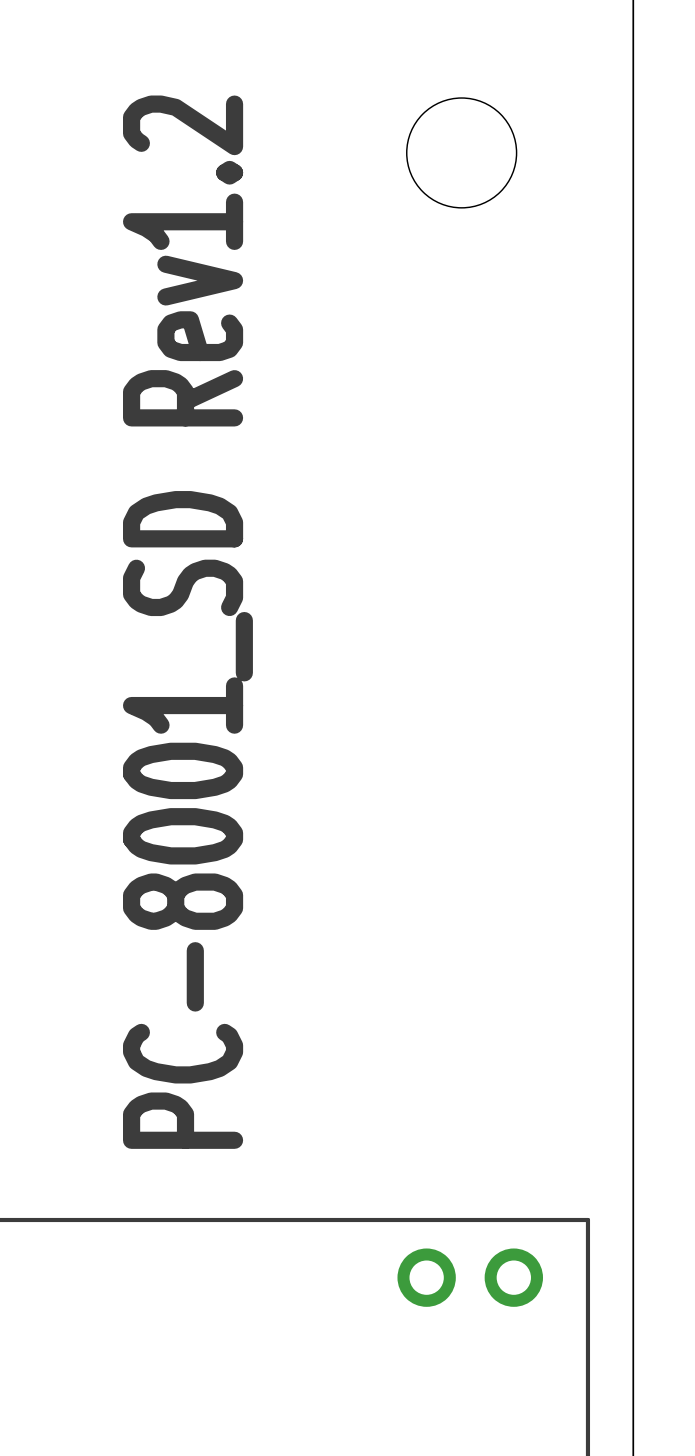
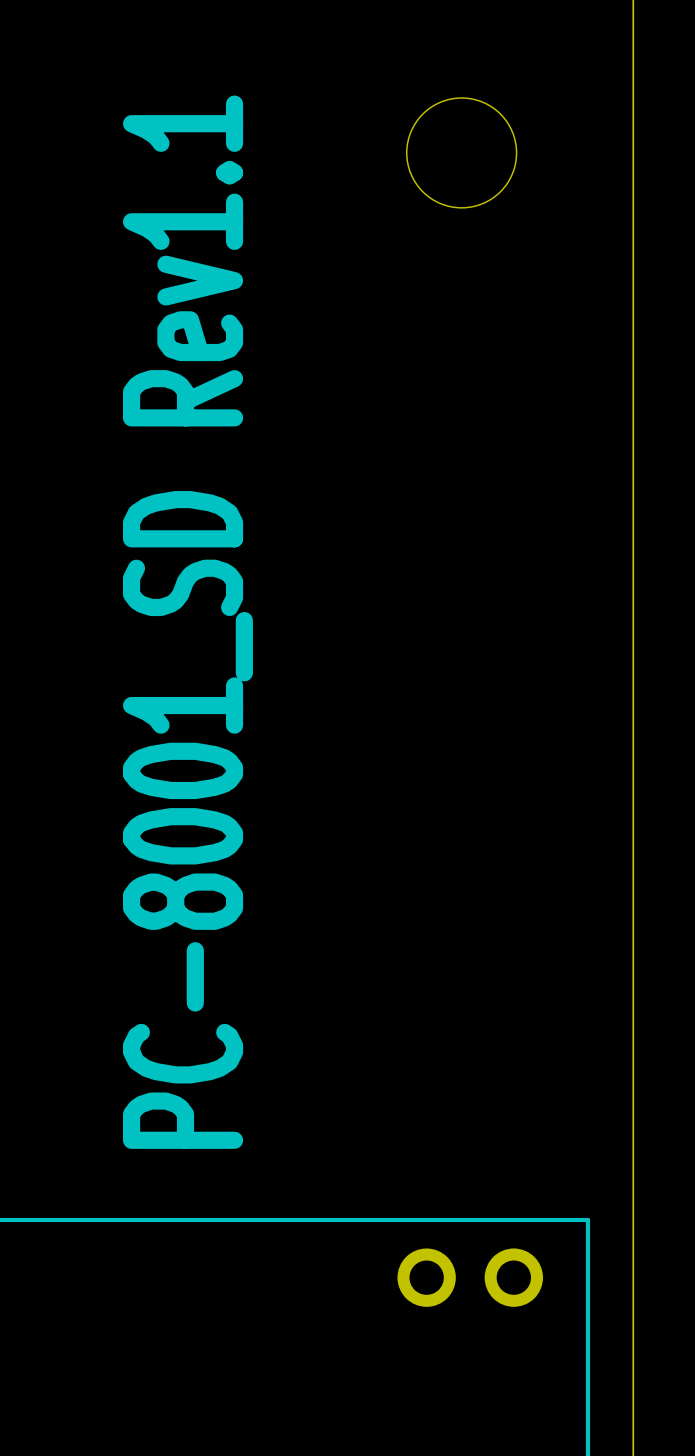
text: PC-8001_SD Rev1.2 (187, 622) -> PC-8001_SD Rev1.1 (187, 622)

